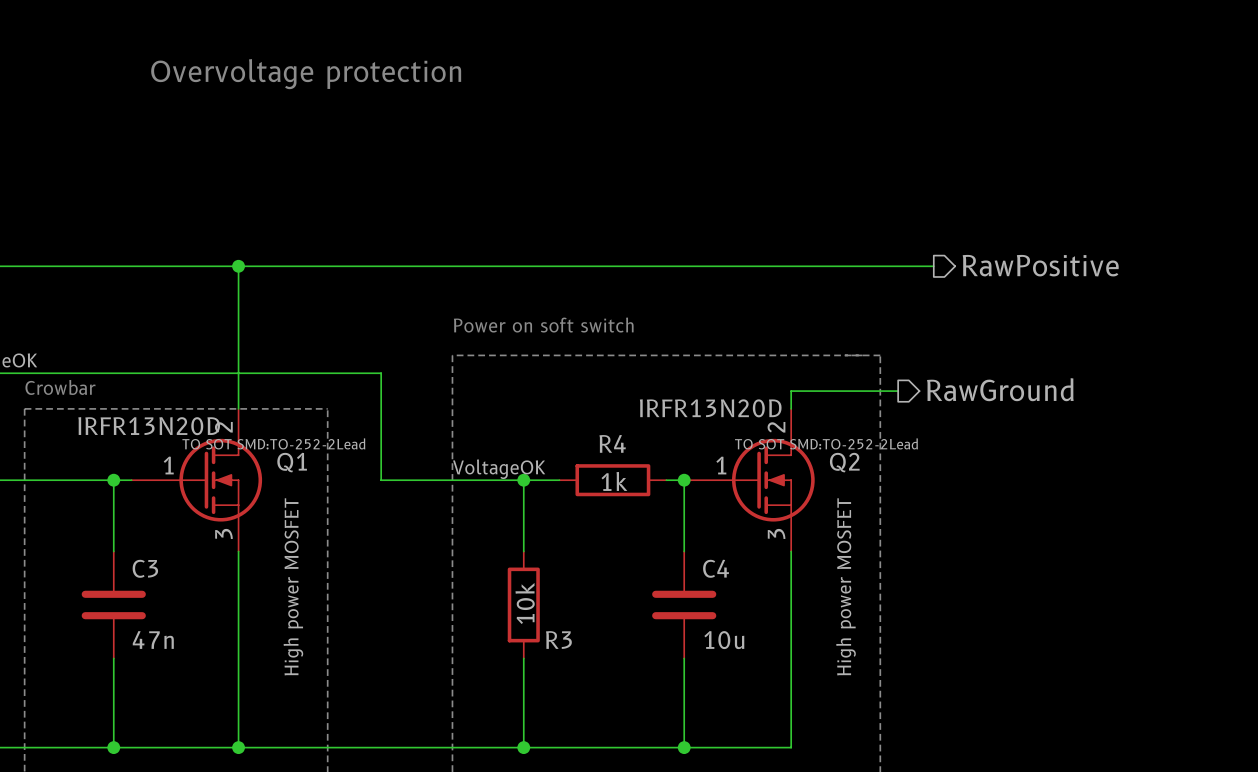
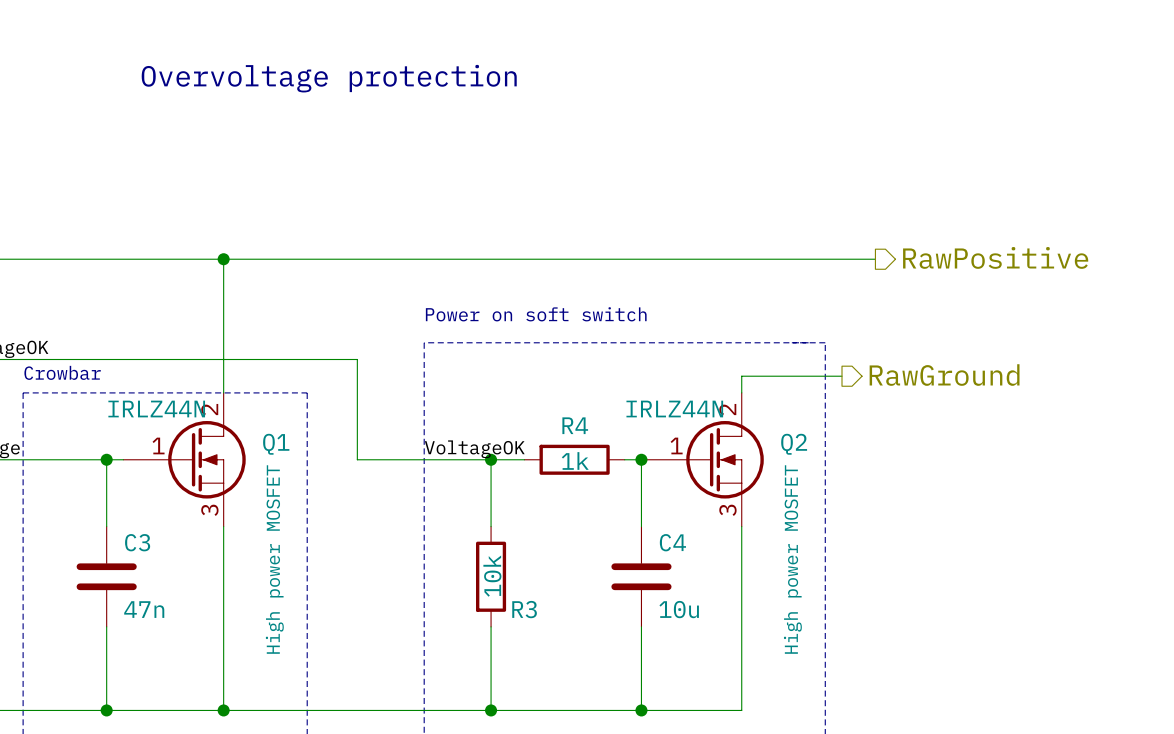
Q2 value: IRFR13N20D (710, 408) -> IRLZ44N (674, 409)
Q1 value: IRFR13N20D (149, 426) -> IRLZ44N (156, 409)
Q1 text: TO SOT SMD:TO-252-2Lead (273, 443) -> none
Q2 text: TO SOT SMD:TO-252-2Lead (826, 443) -> none

